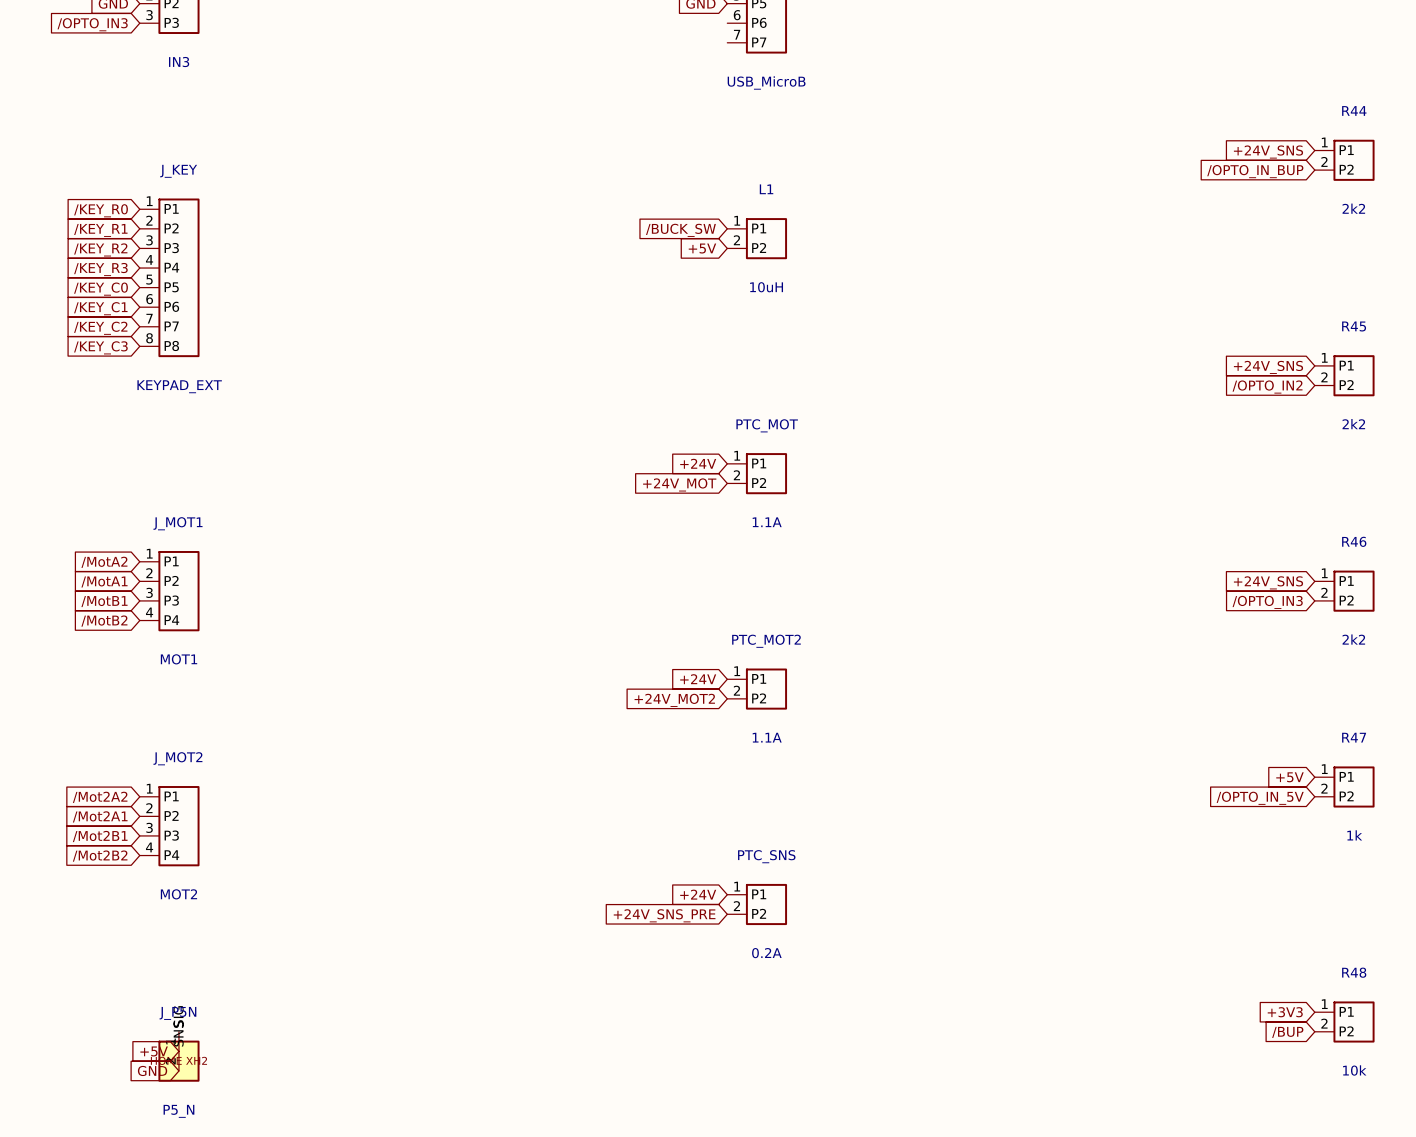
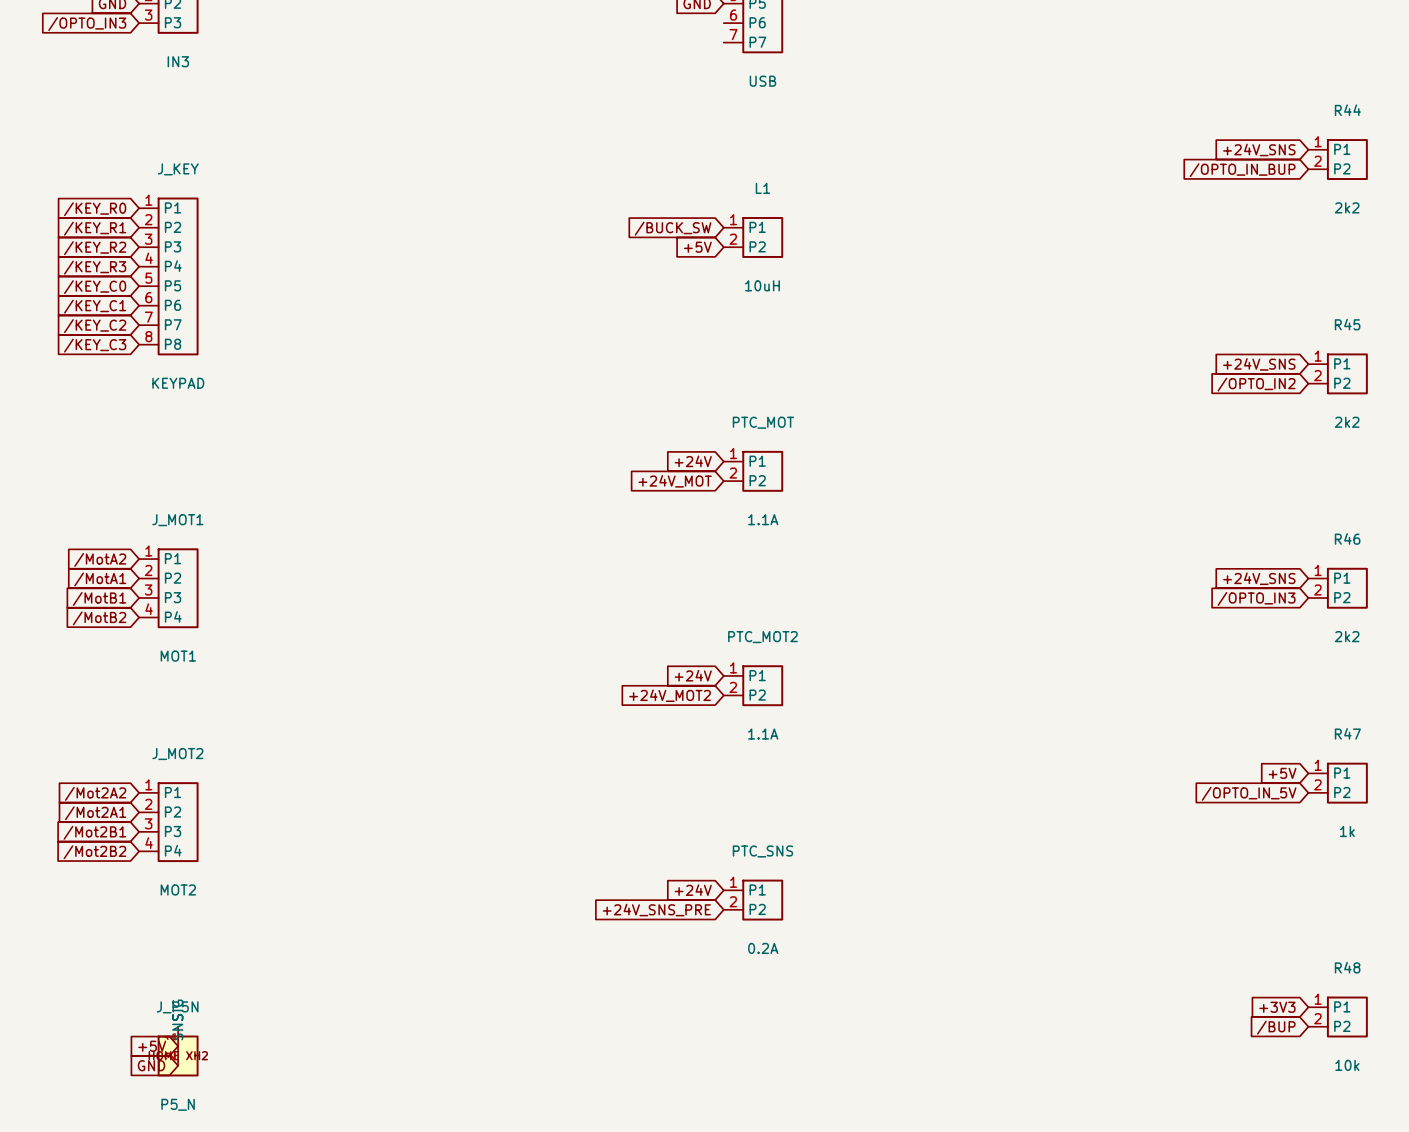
part value: USB_MicroB (766, 82) -> USB (762, 81)
J_KEY value: KEYPAD_EXT (179, 386) -> KEYPAD (178, 383)

